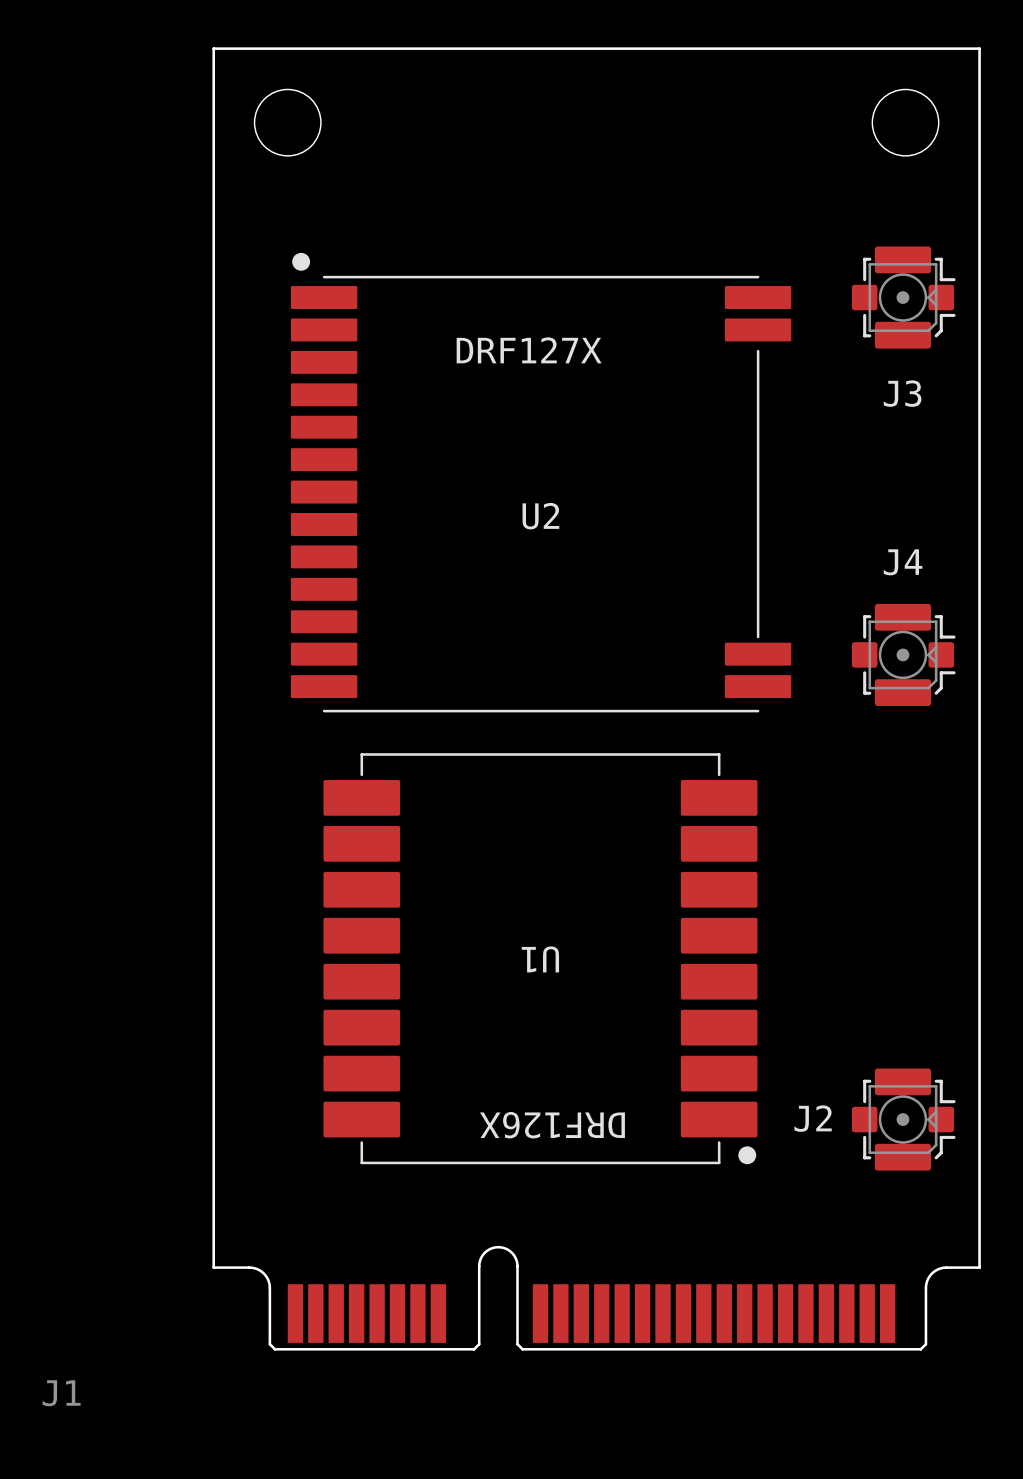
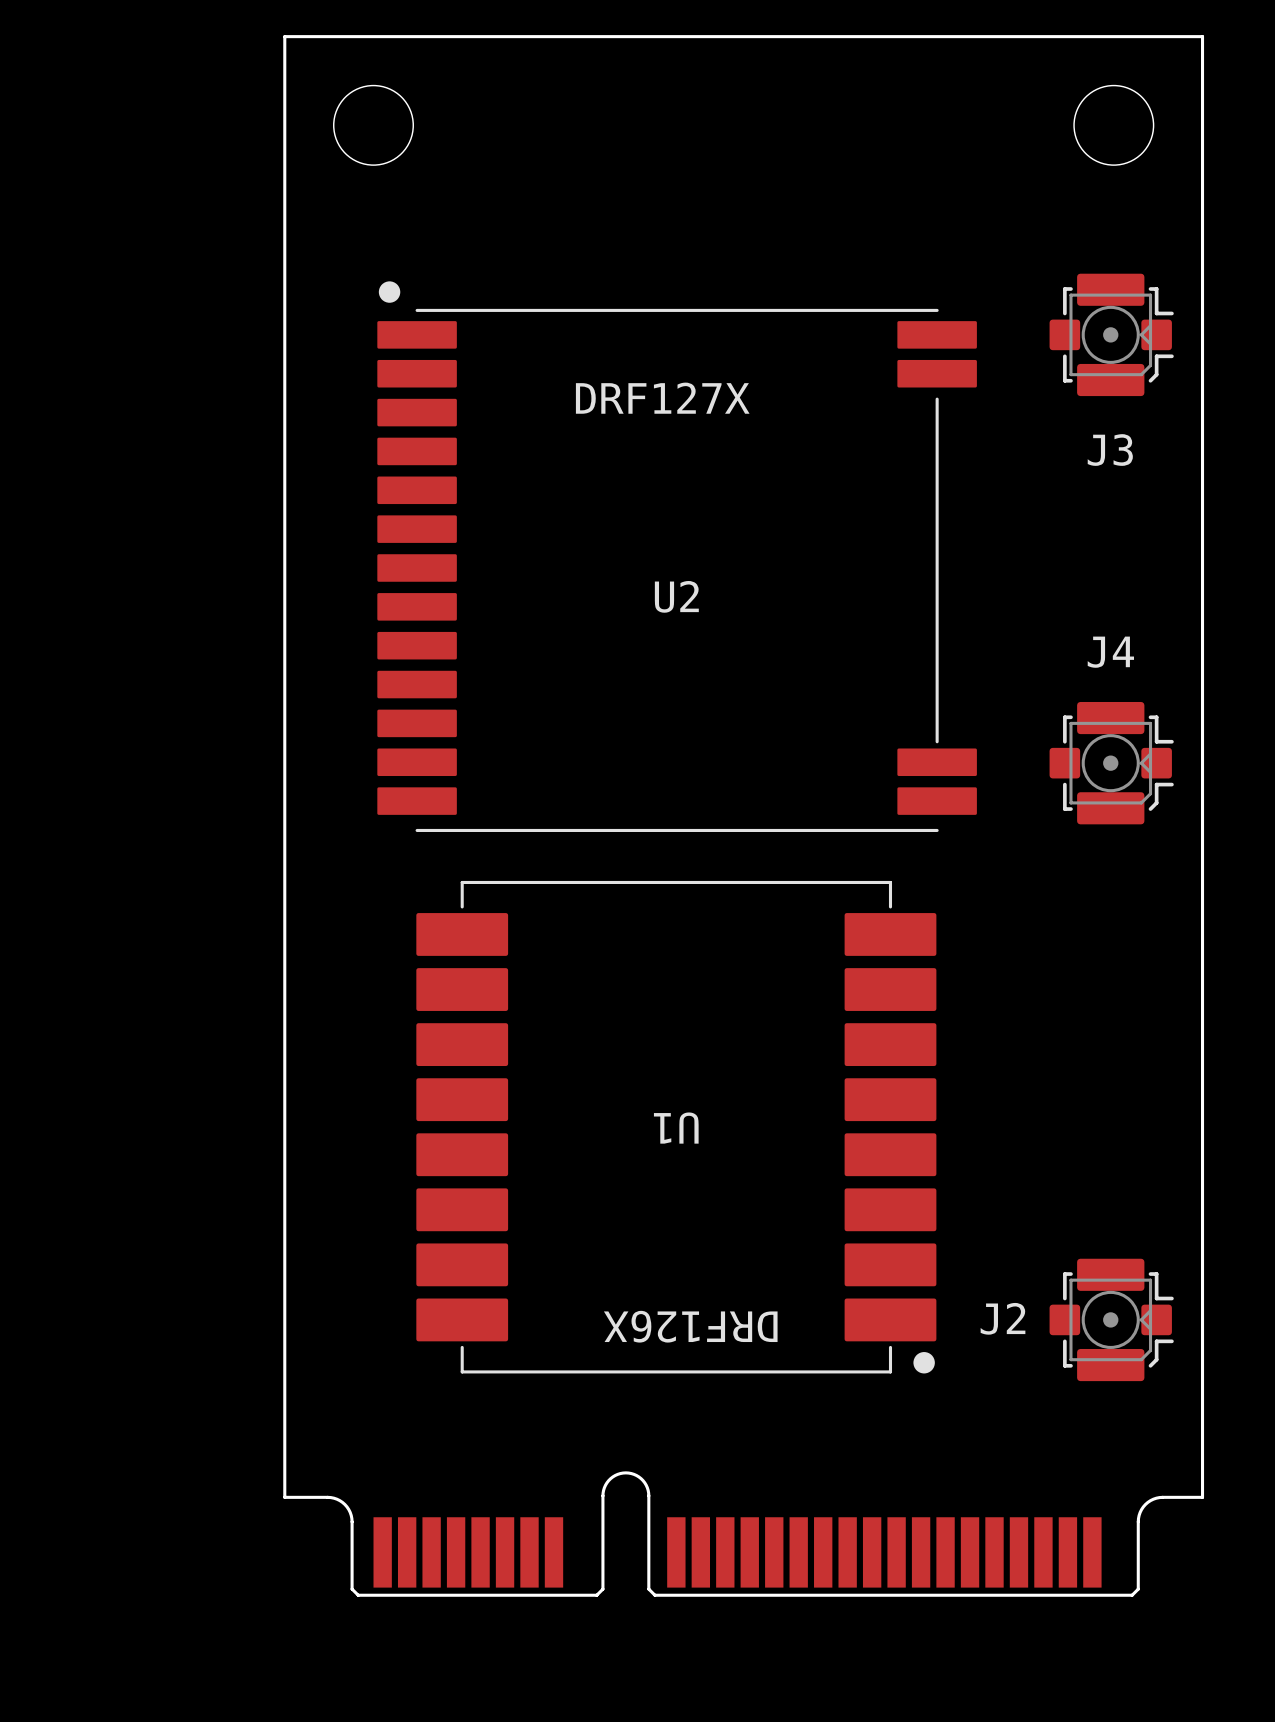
J1 name: J1 (61, 1393) -> none

